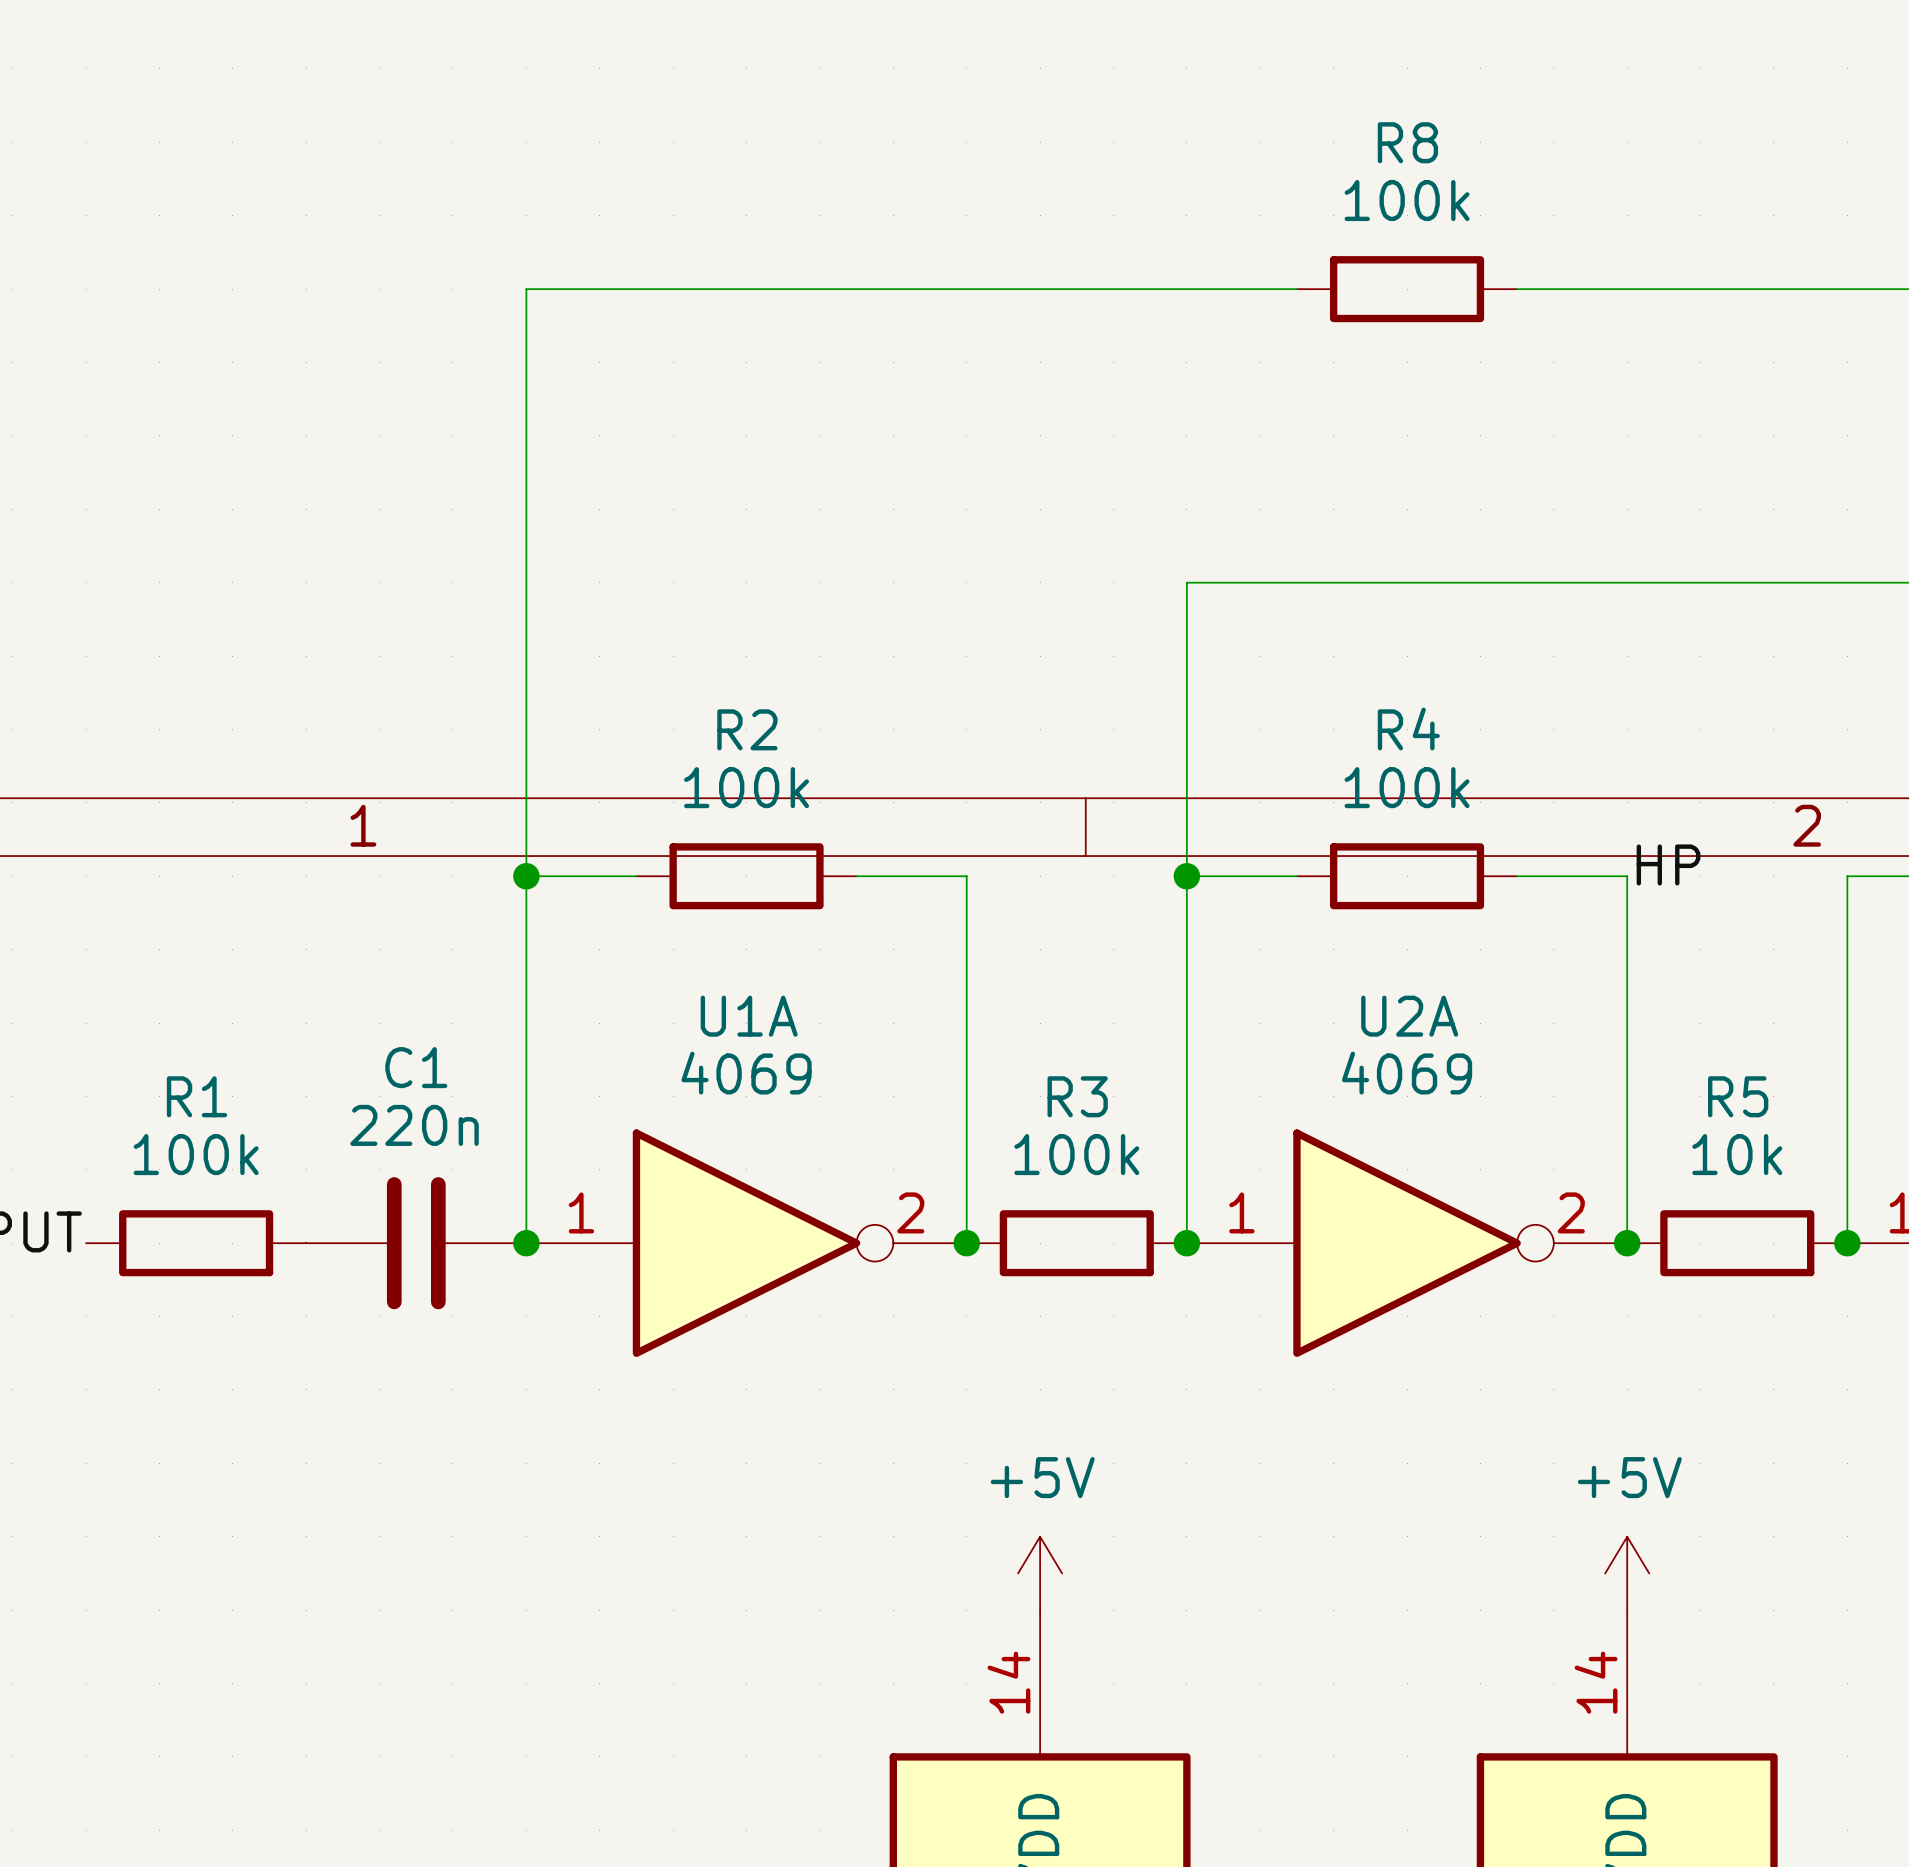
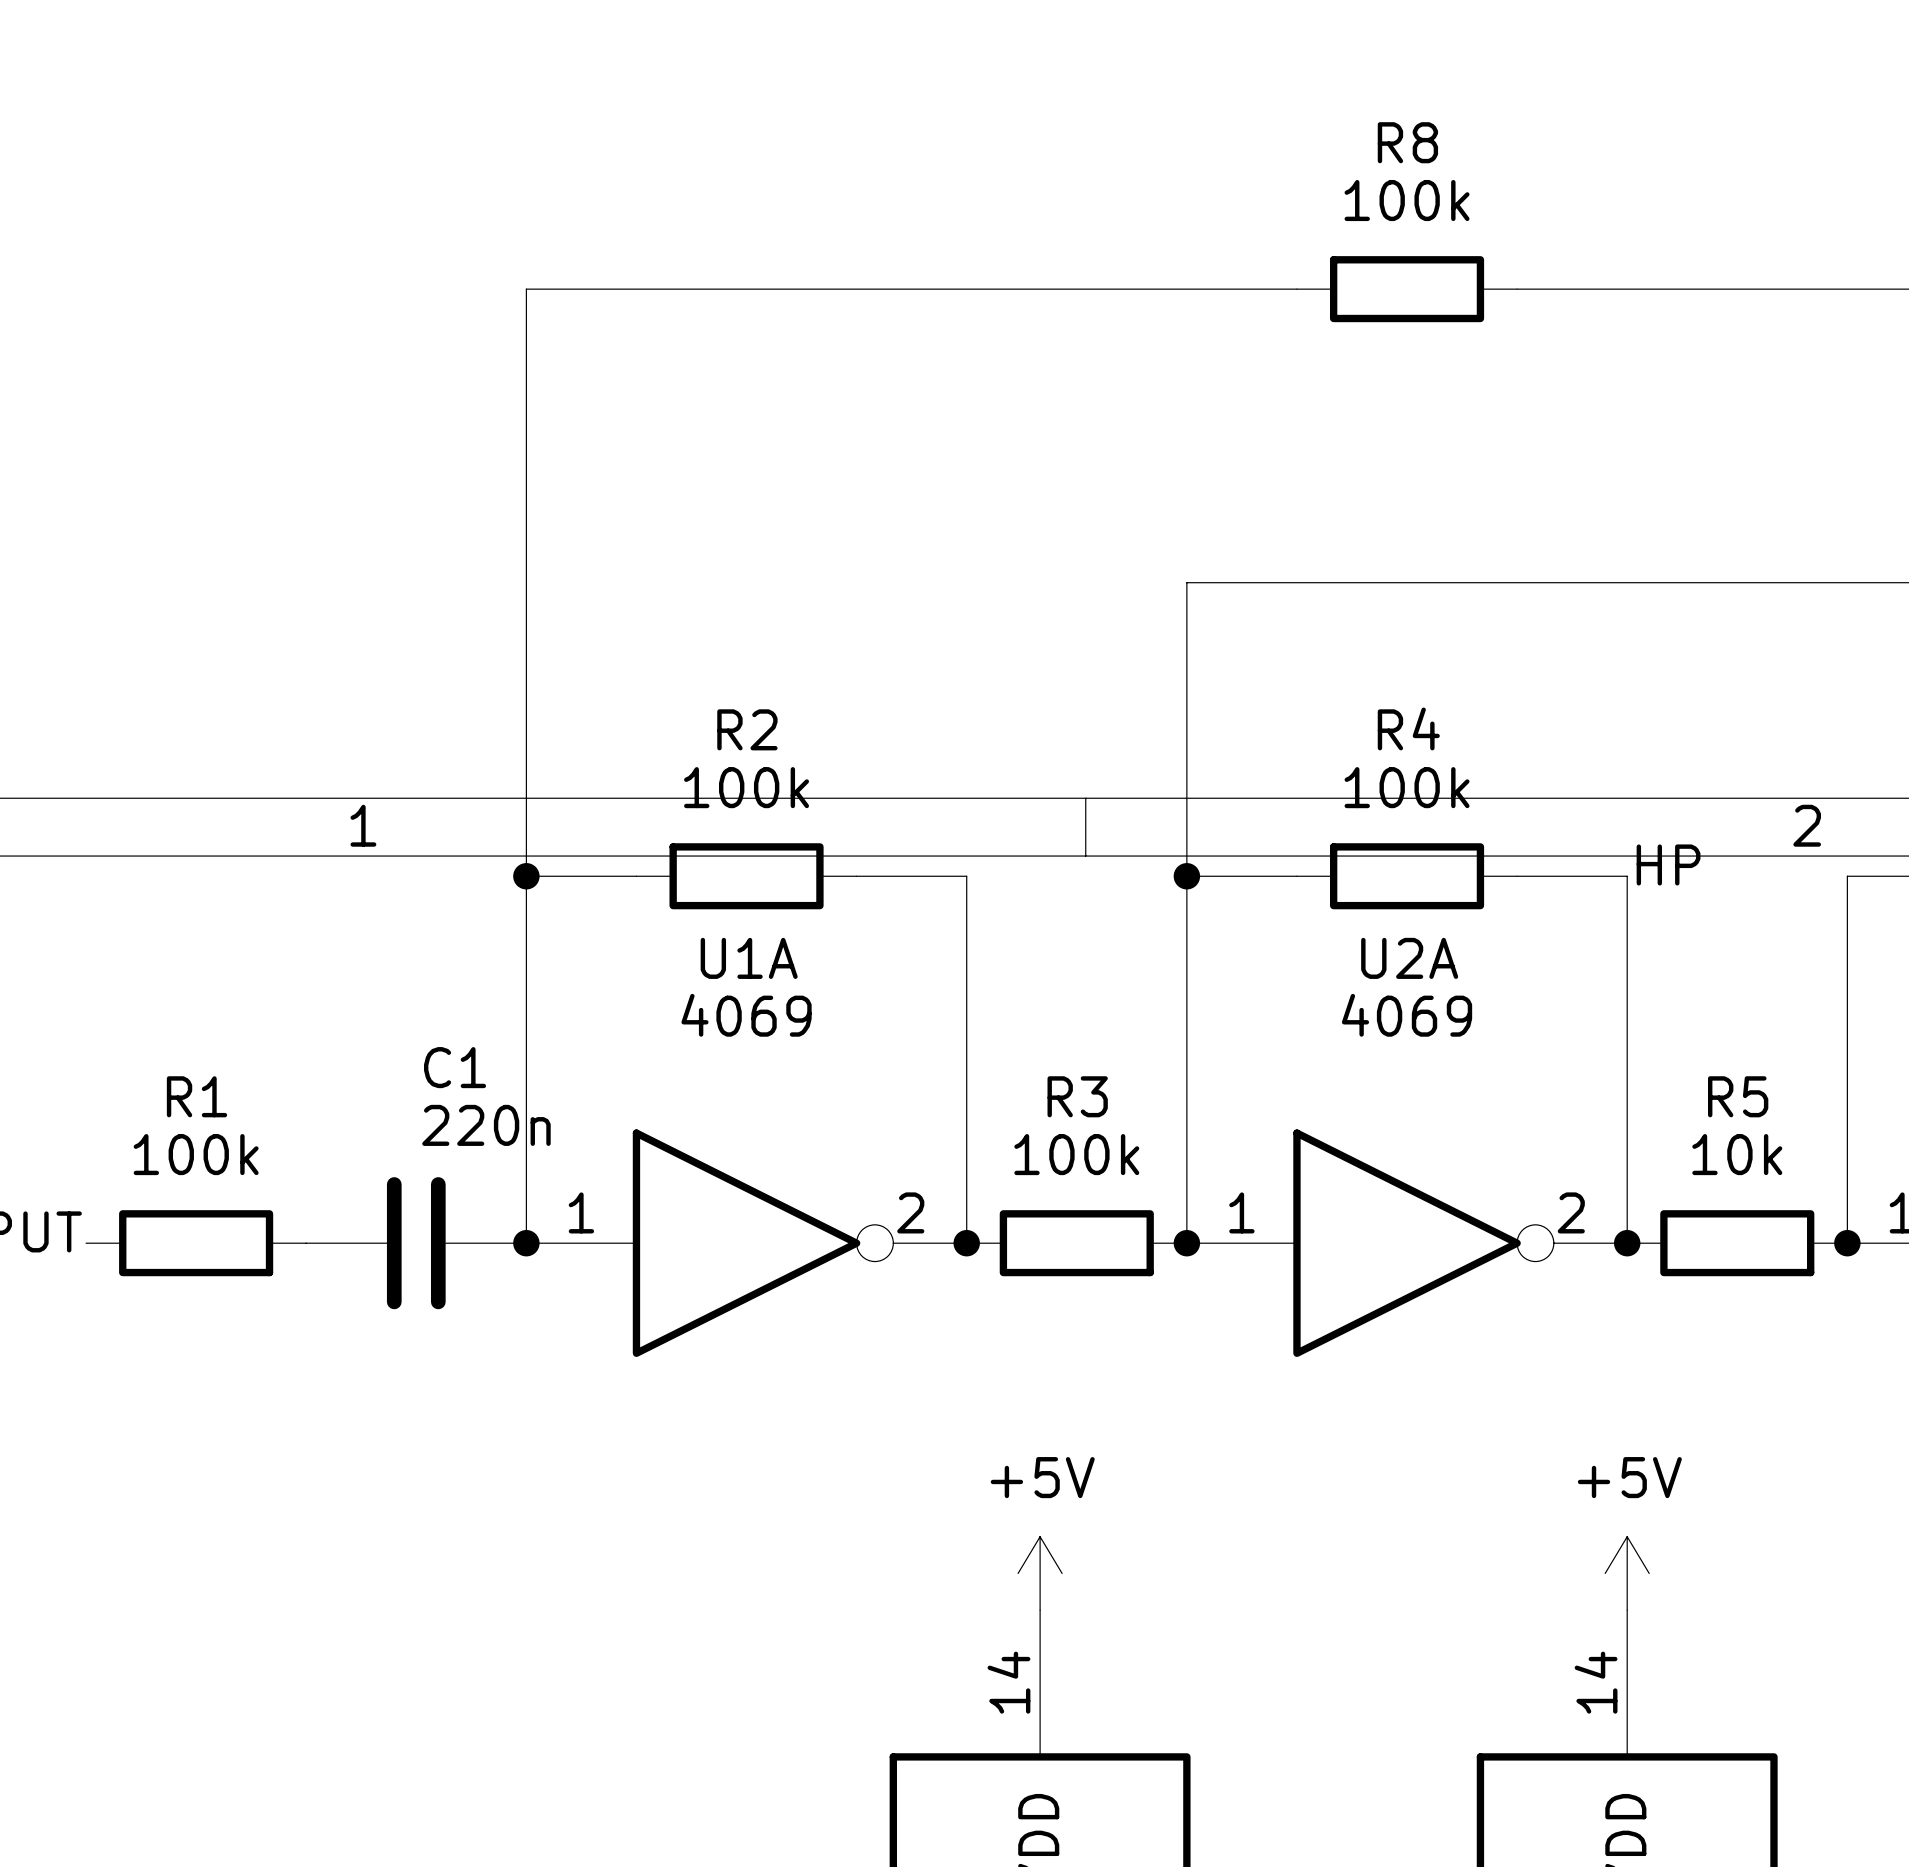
U1A name position: U1A (749, 1016) -> U1A (749, 958)
U2A name position: U2A (1409, 1016) -> U2A (1409, 958)
C1 name position: C1 (416, 1067) -> C1 (455, 1067)
U1A value position: 4069 (746, 1073) -> 4069 (746, 1015)
U2A value position: 4069 (1407, 1073) -> 4069 (1407, 1015)
C1 value position: 220n (414, 1125) -> 220n (486, 1125)

